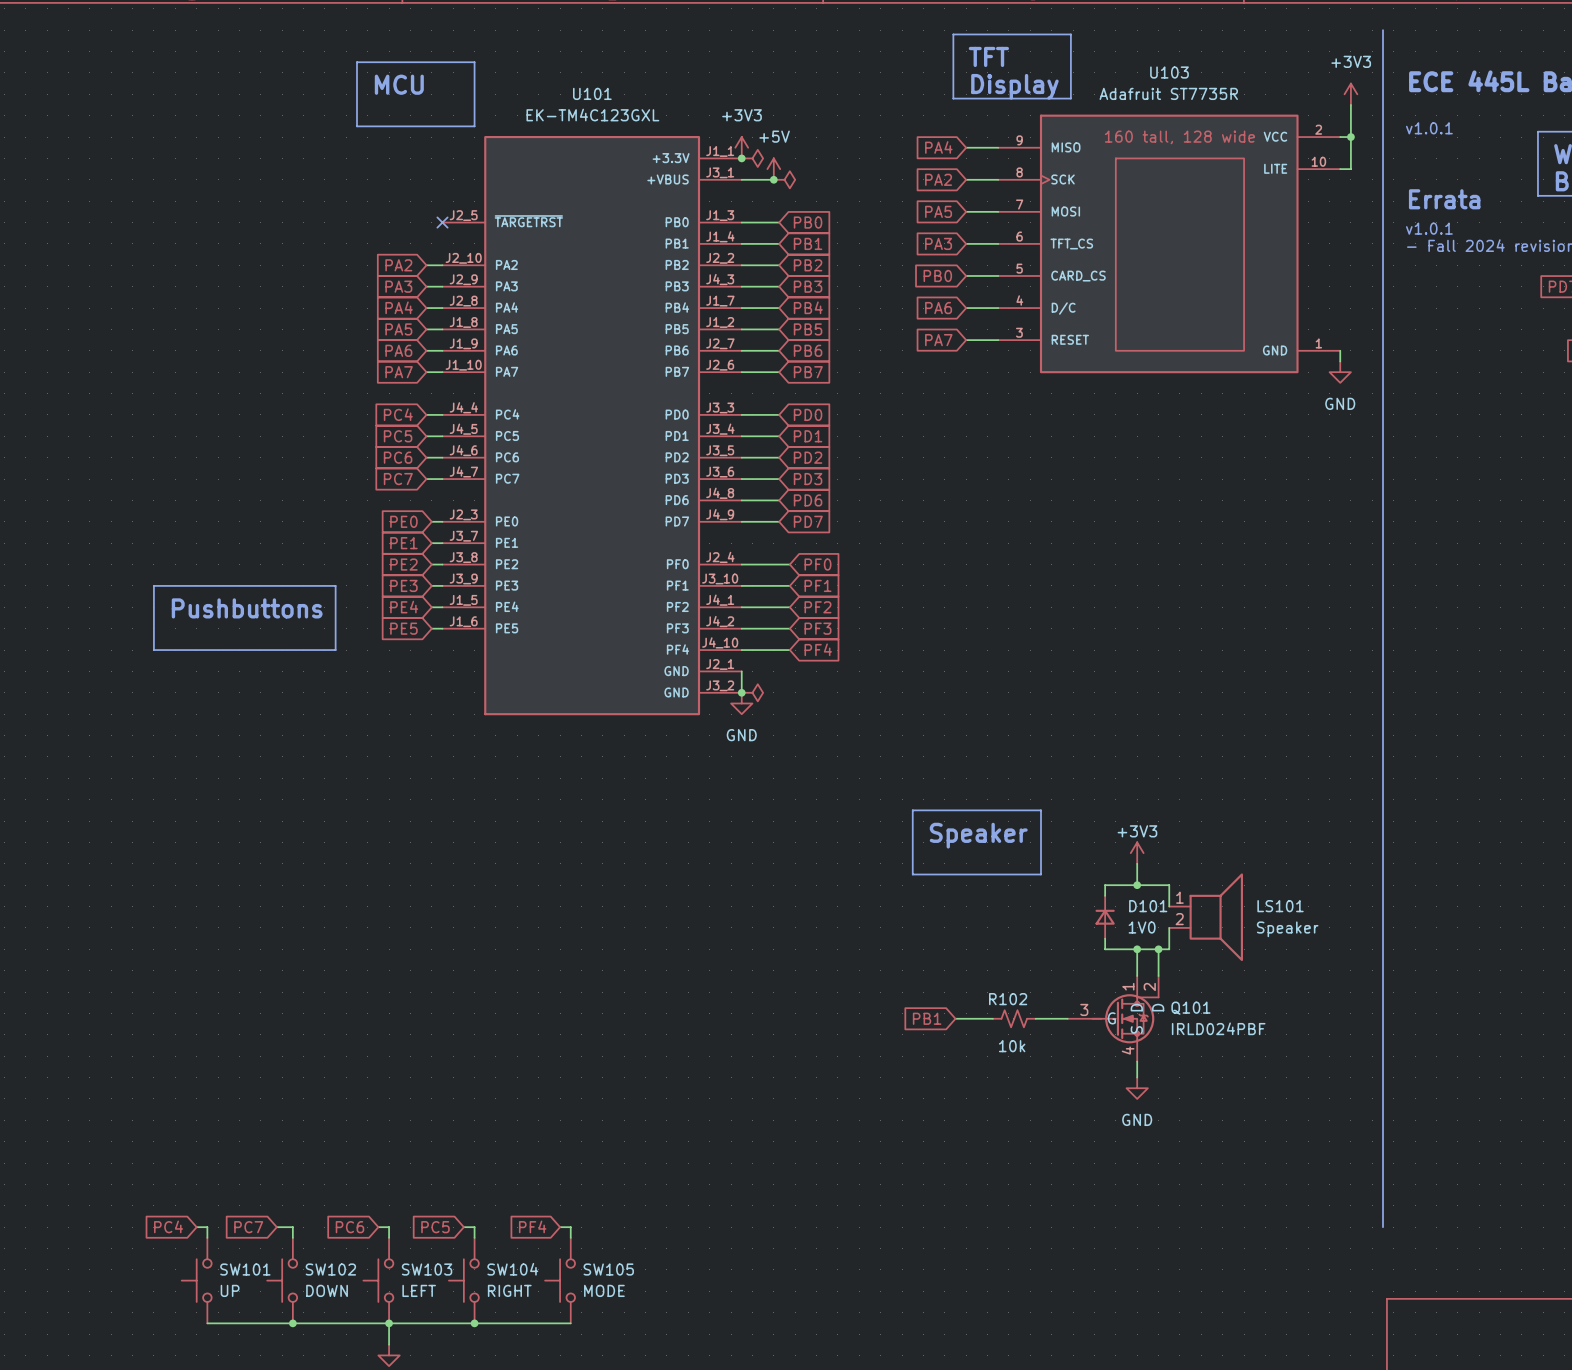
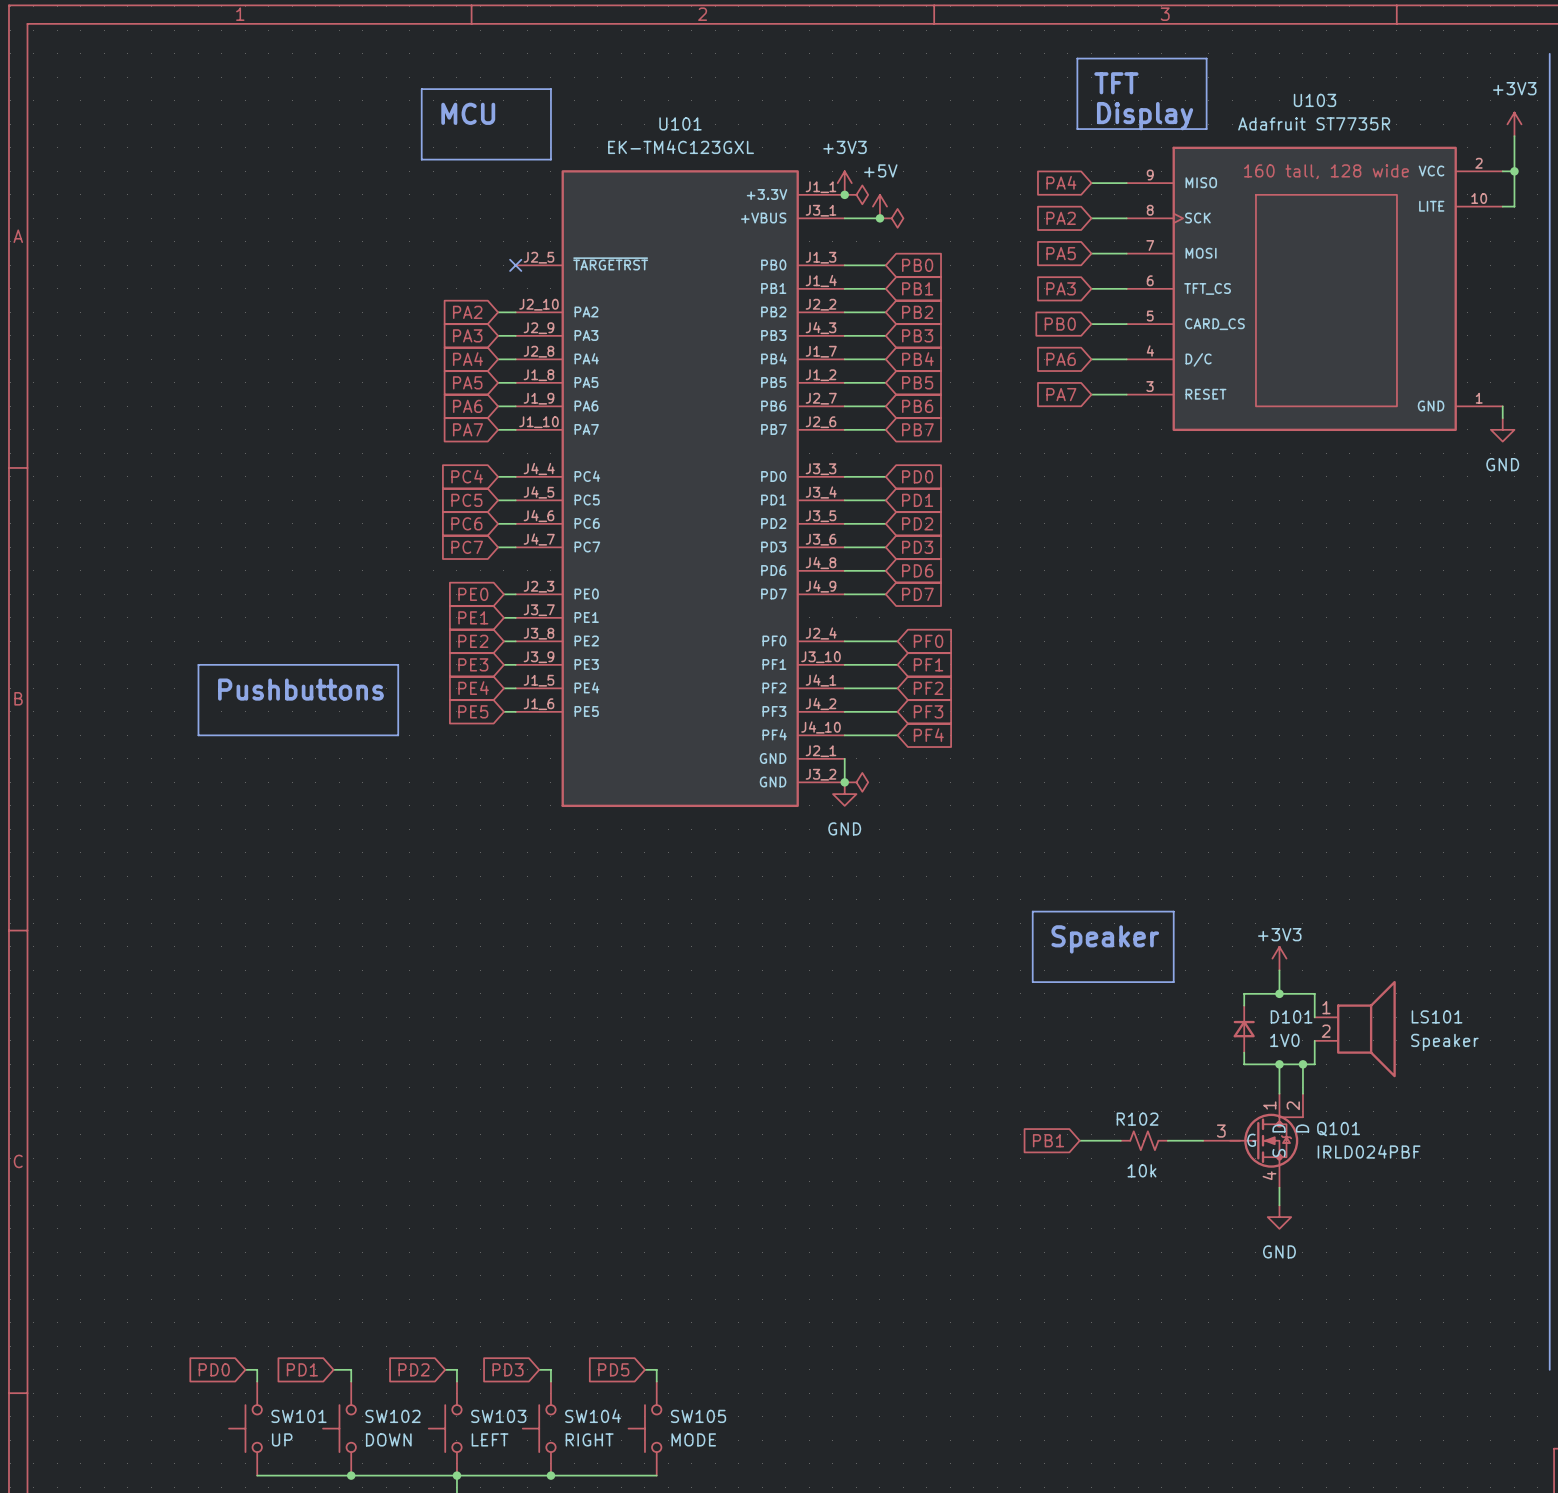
global label: PC4 (168, 1226) -> PD0 (214, 1369)
global label: PF4 (532, 1226) -> PD5 (613, 1369)
global label: PC7 (248, 1227) -> PD1 (302, 1369)
global label: PC6 (349, 1227) -> PD2 (414, 1369)
global label: PC5 (435, 1227) -> PD3 (508, 1369)

